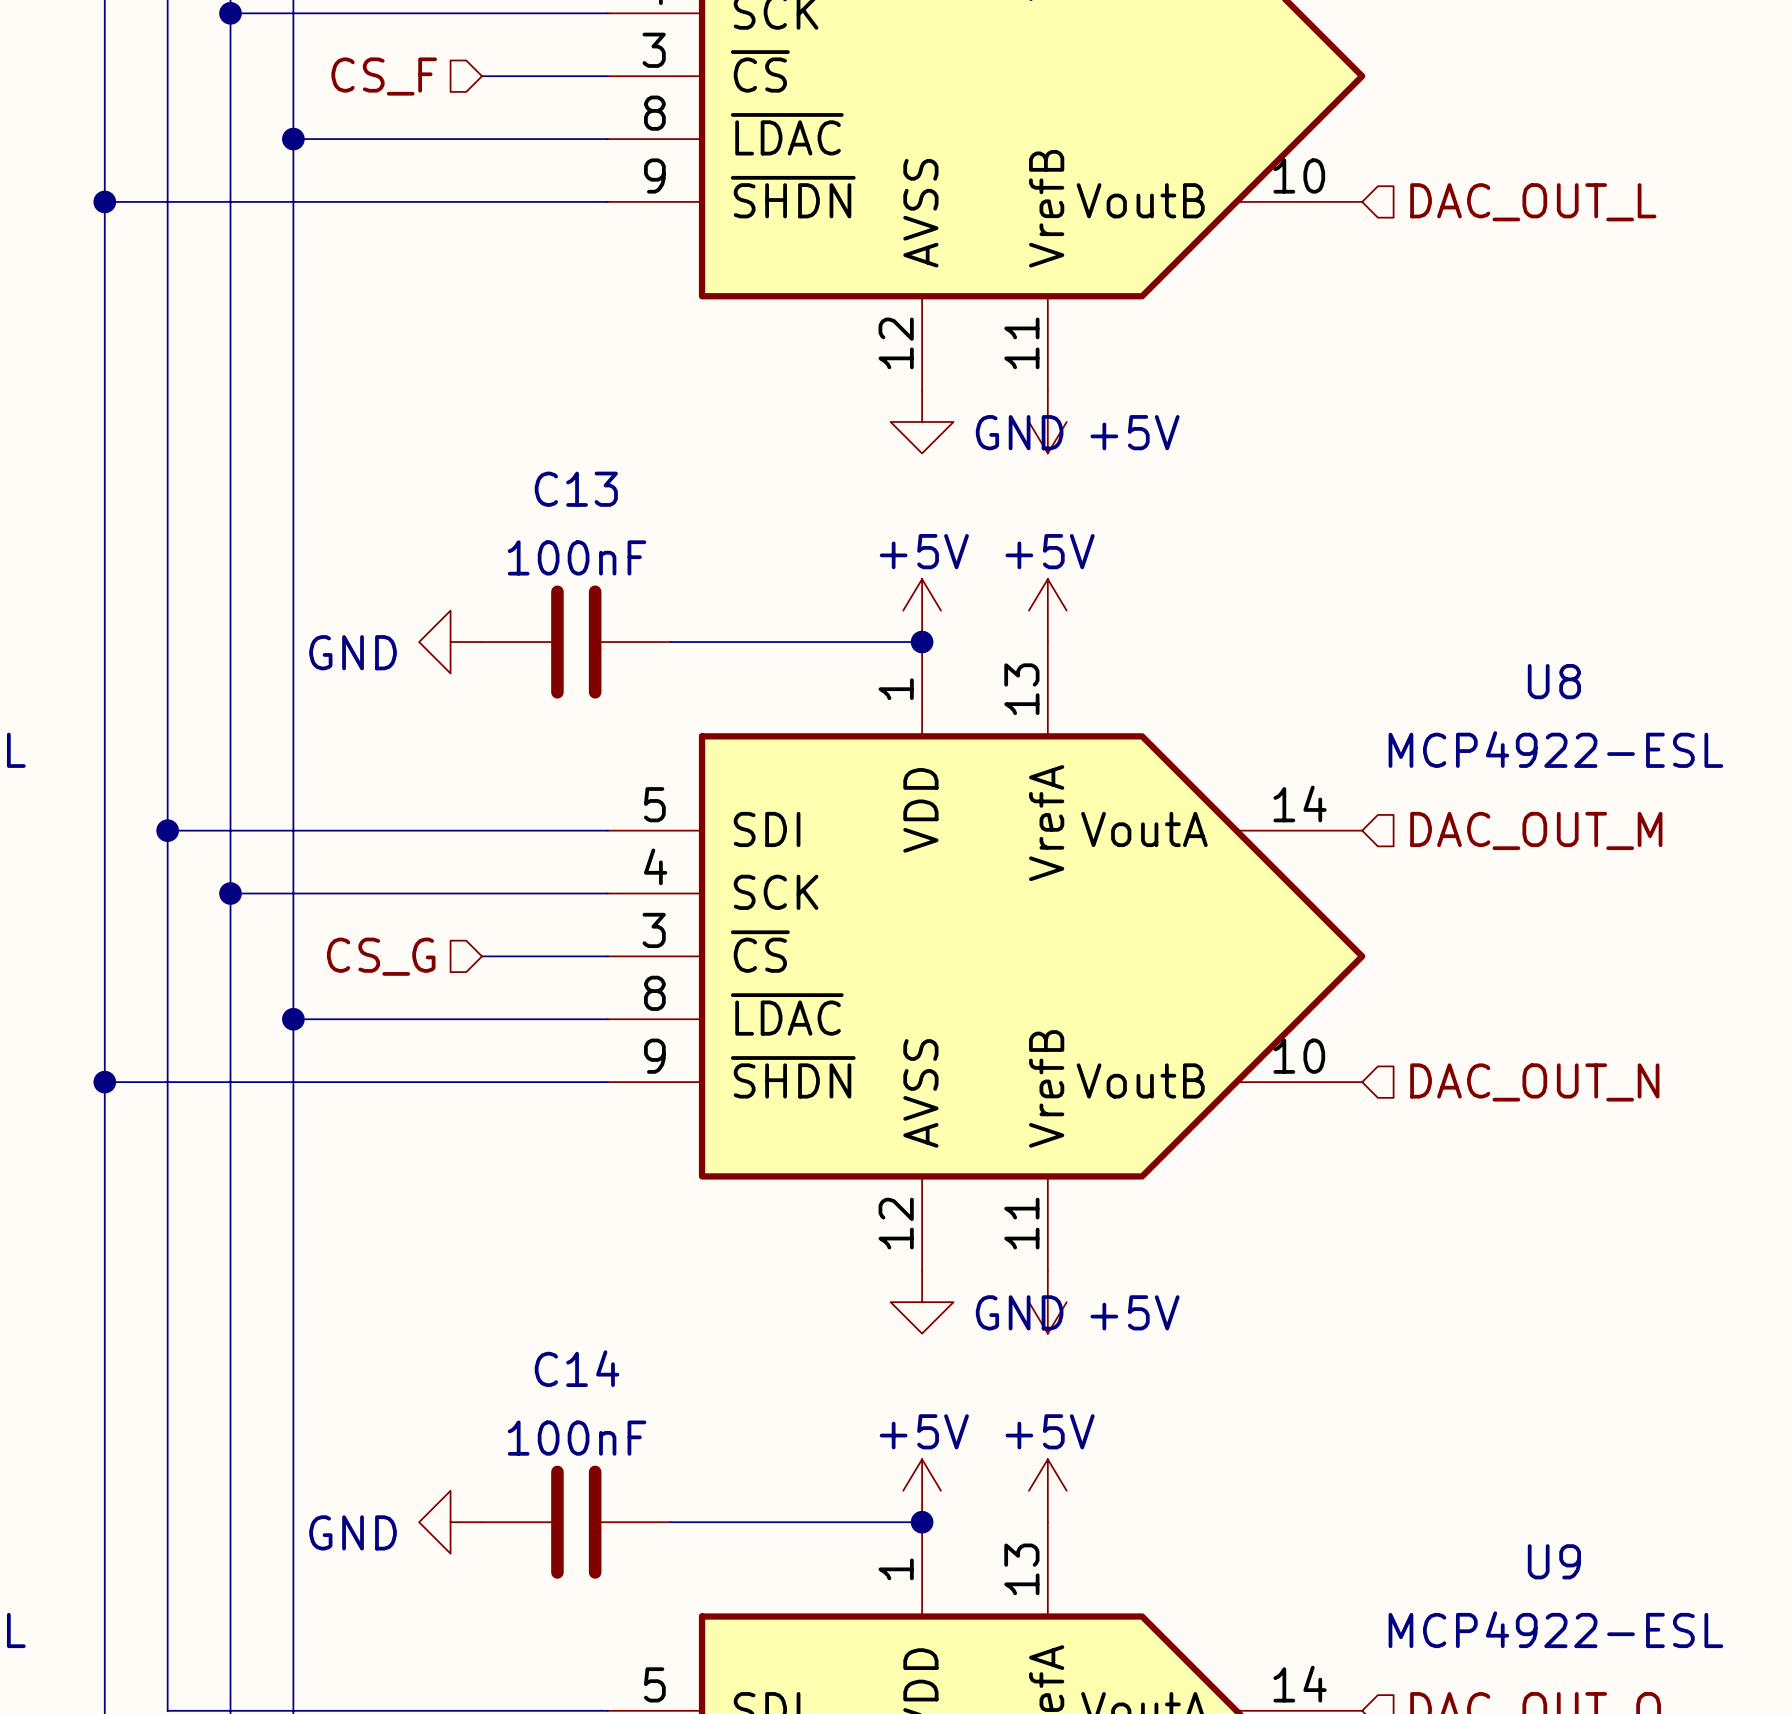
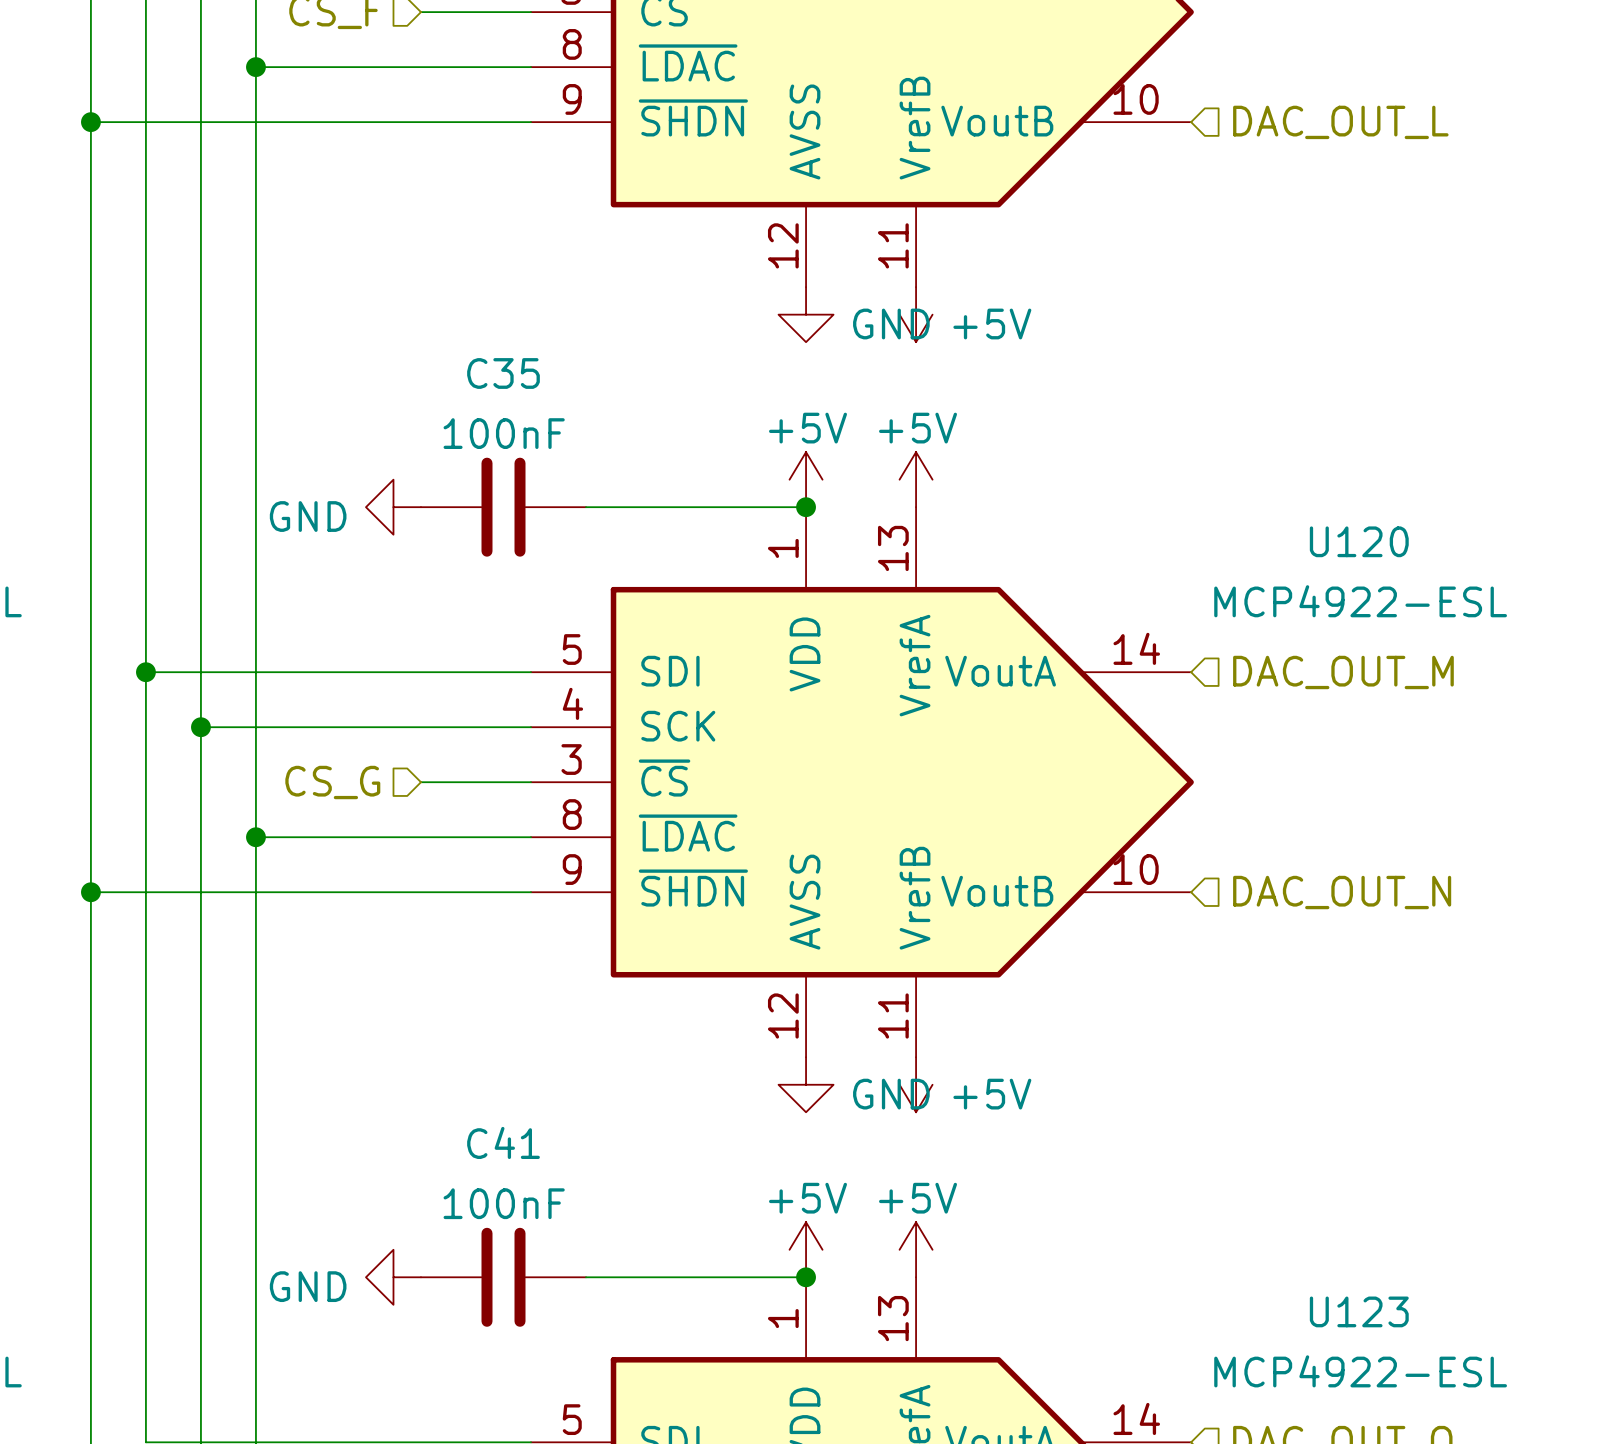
C13 name: C13 (576, 489) -> C35 (503, 373)
U8 name: U8 (1554, 681) -> U120 (1359, 541)
C14 name: C14 (577, 1368) -> C41 (503, 1142)
U9 name: U9 (1554, 1561) -> U123 (1359, 1311)

